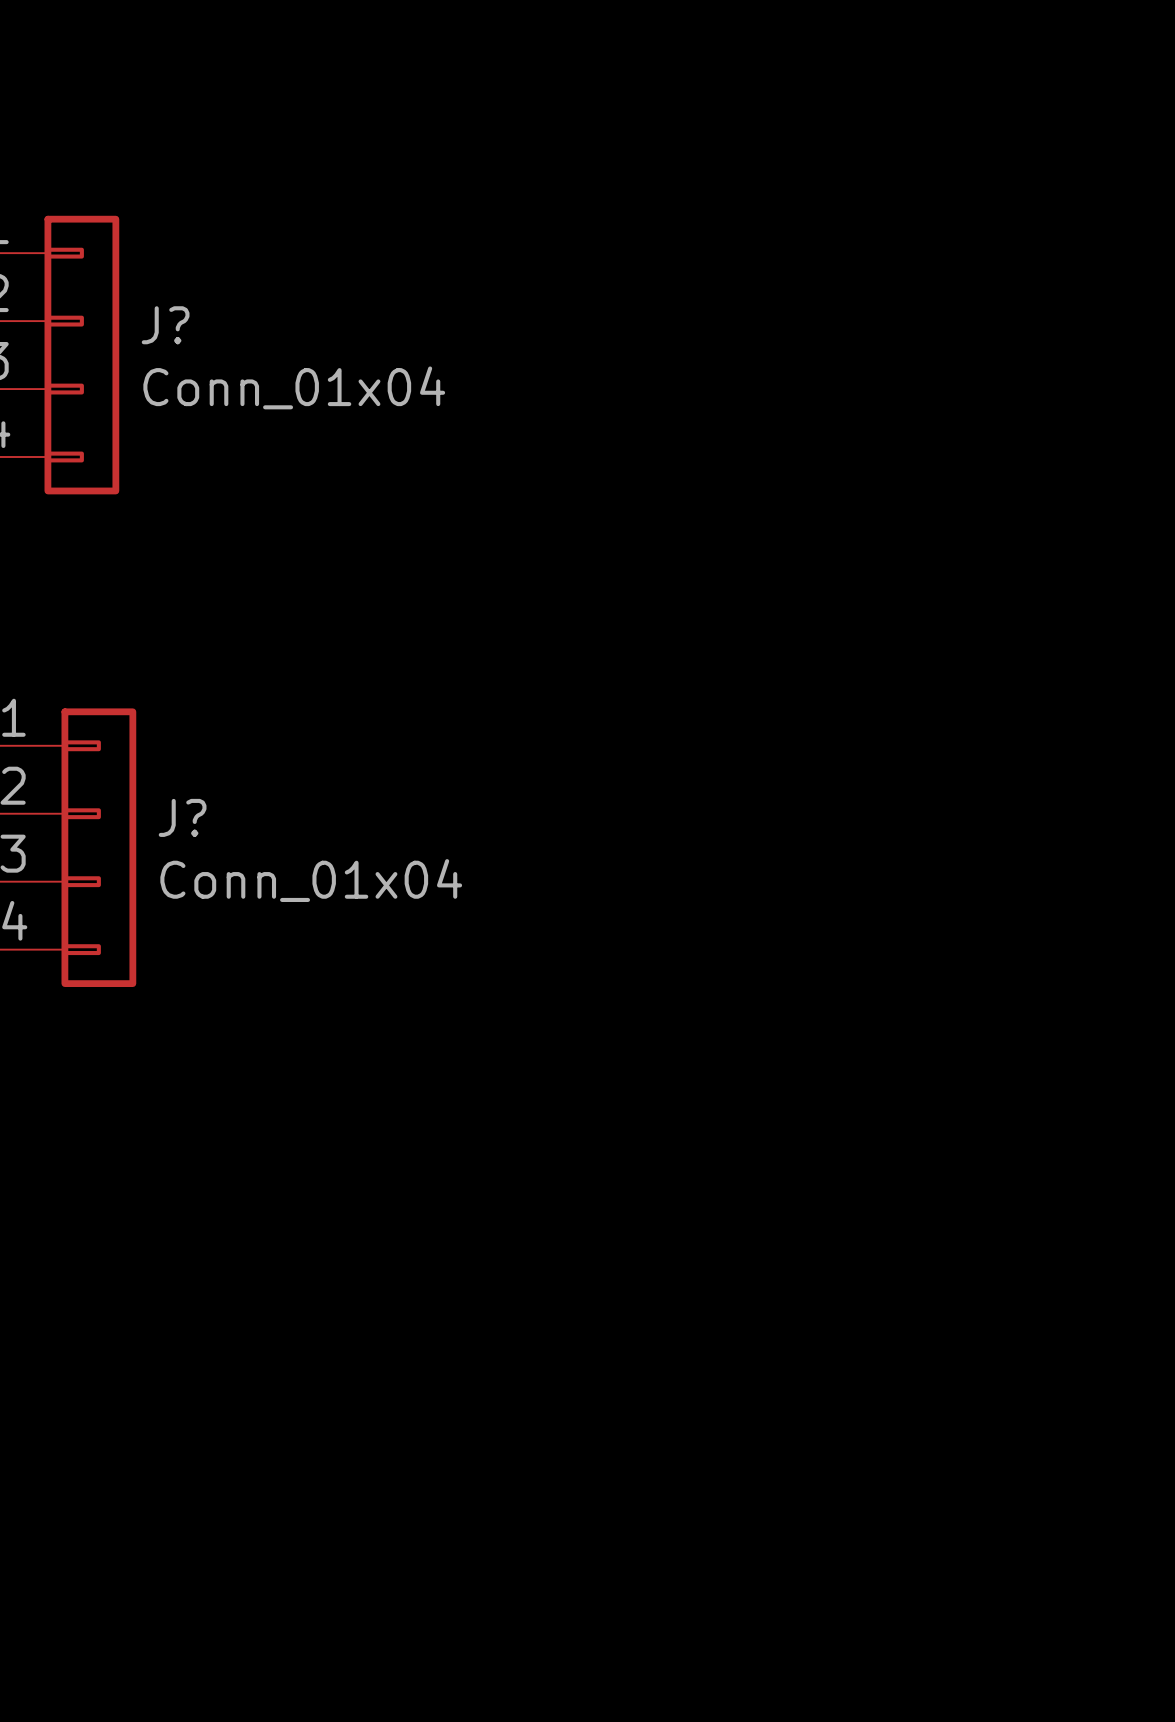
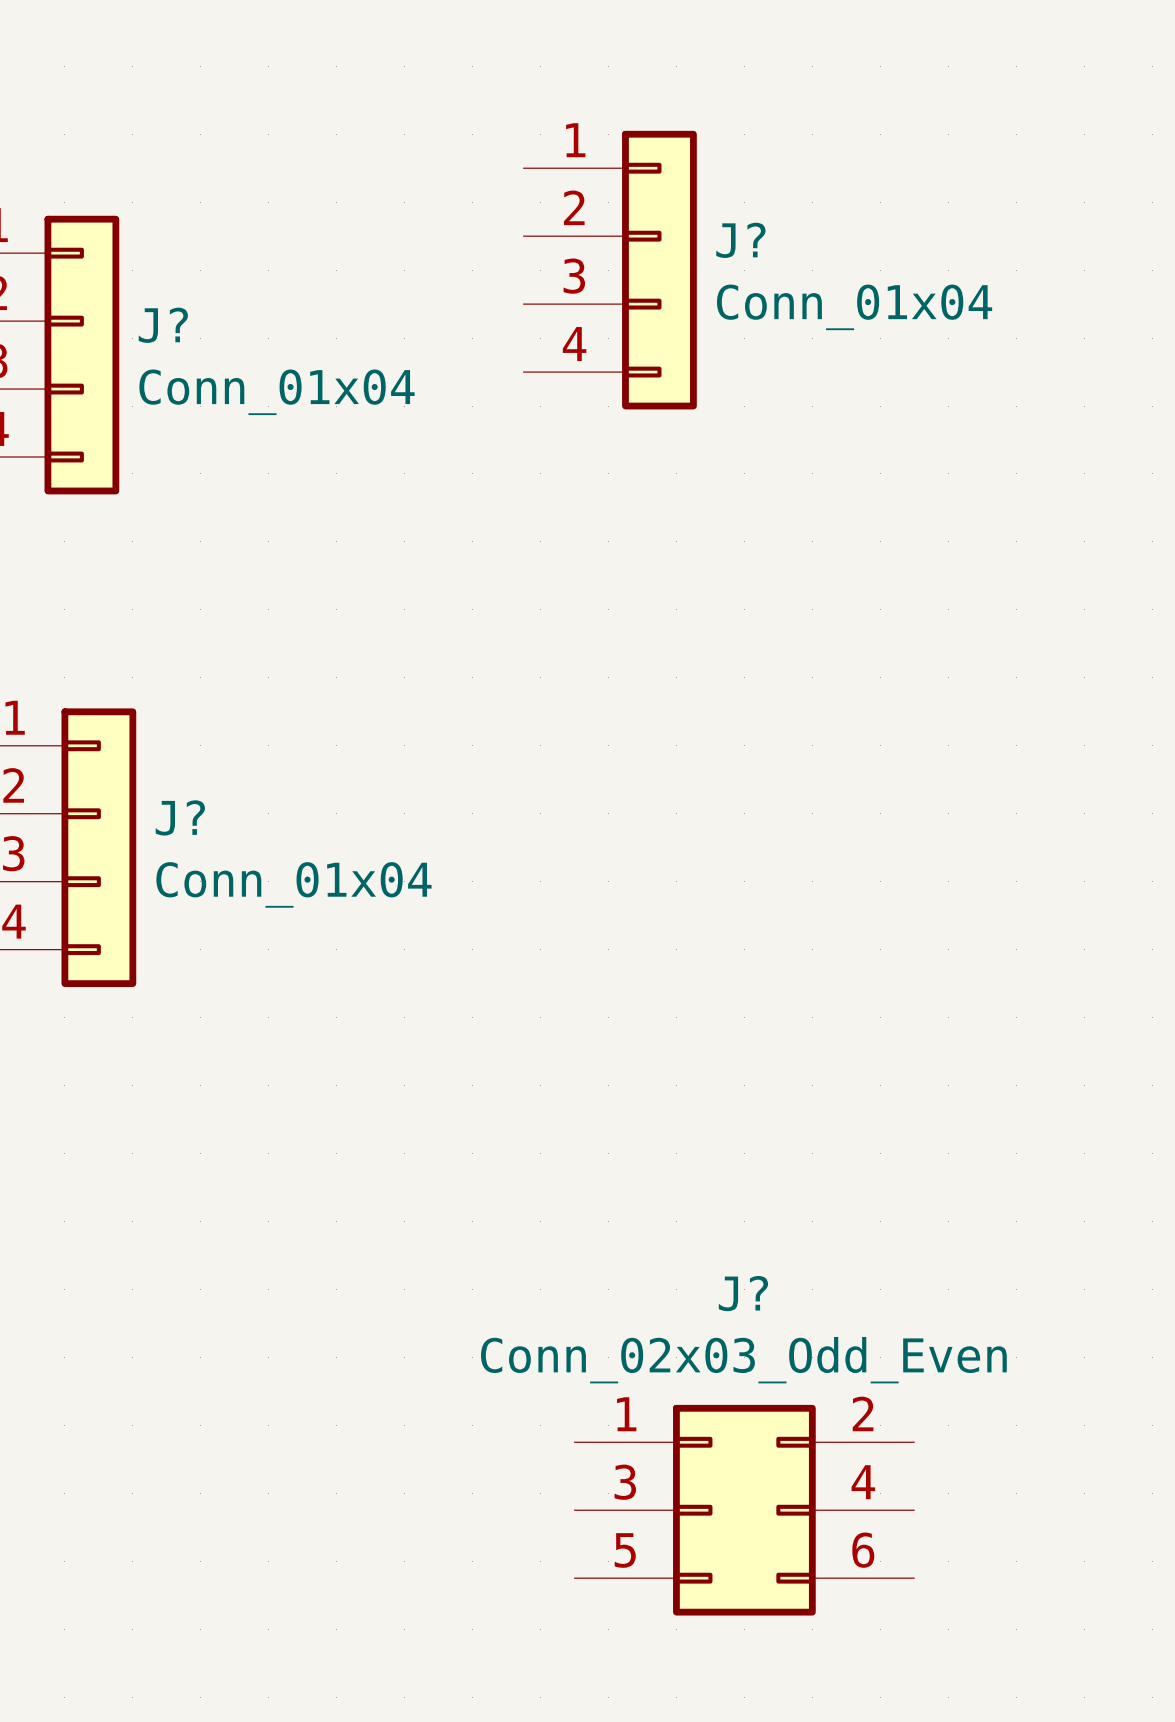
J?: none -> Conn_01x04 (610, 270)
J?: none -> Conn_02x03_Odd_Even (744, 1510)

